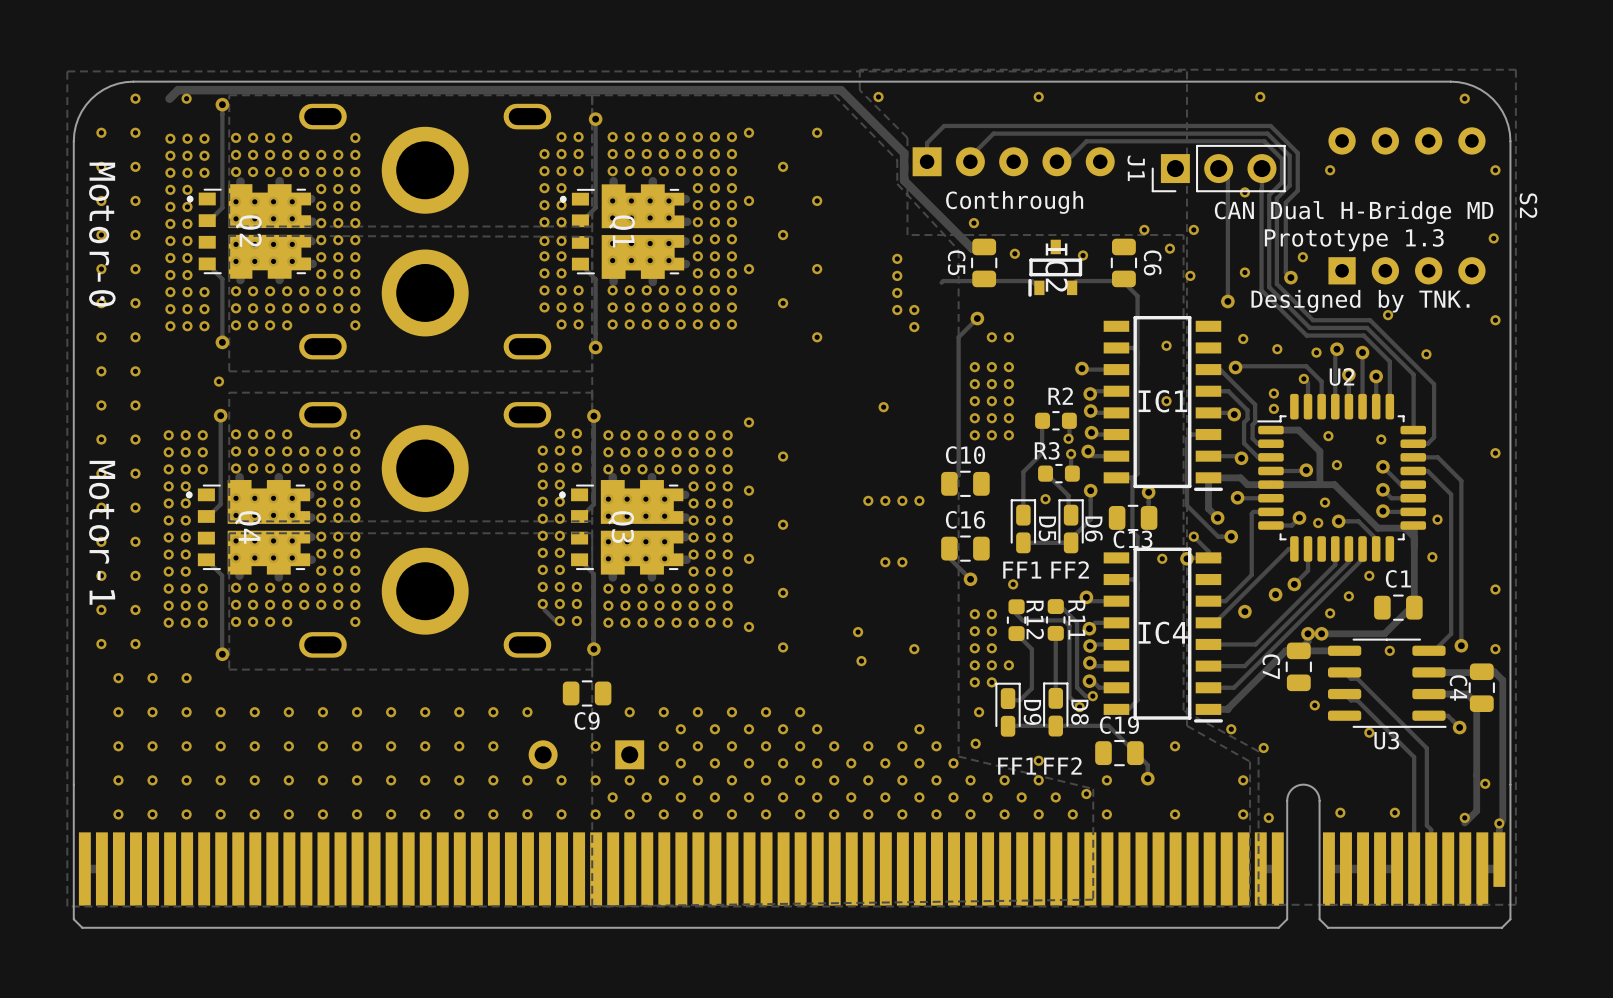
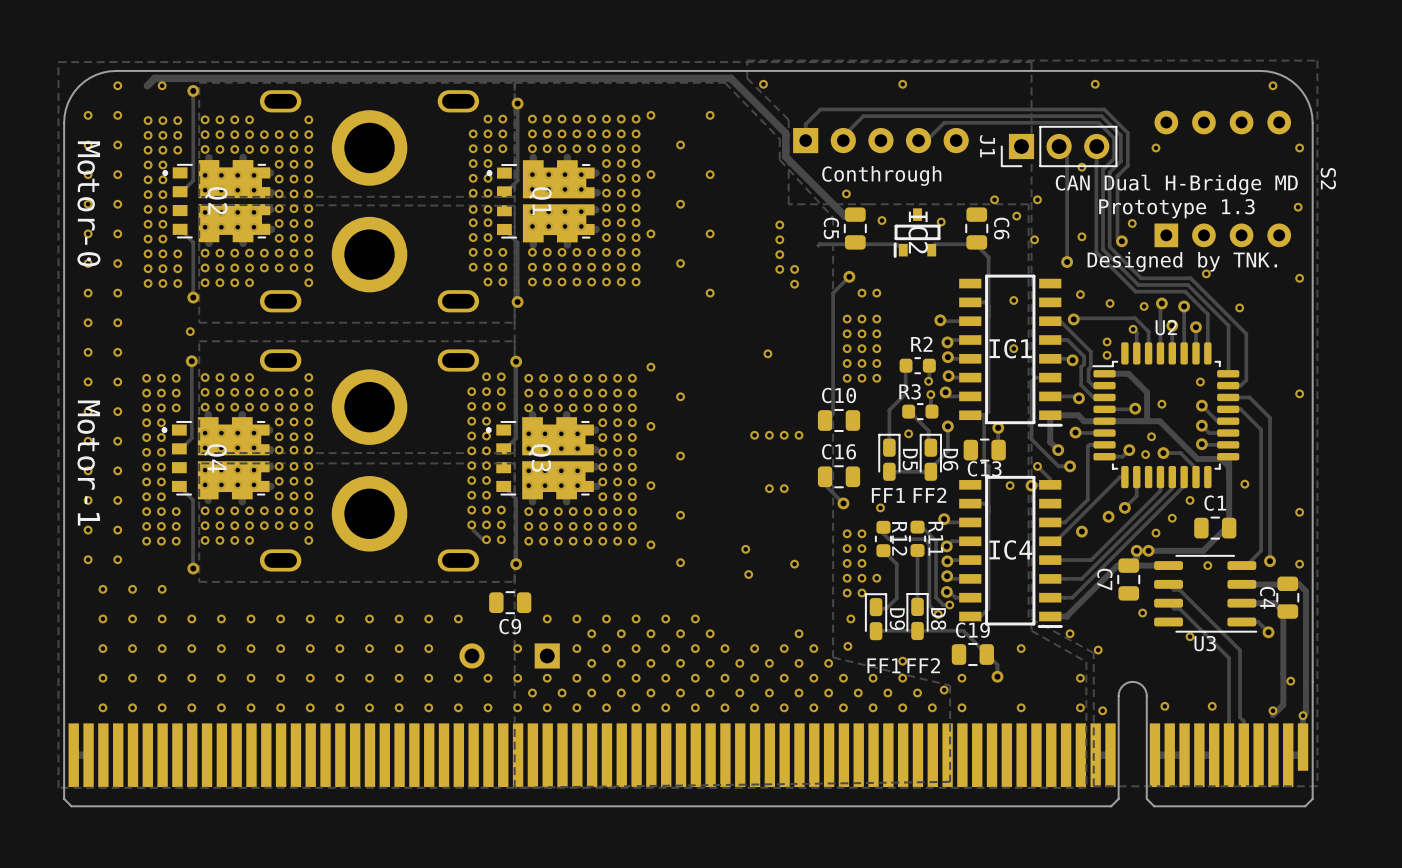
via: (1328, 436) -> none
via: (1437, 519) -> none

